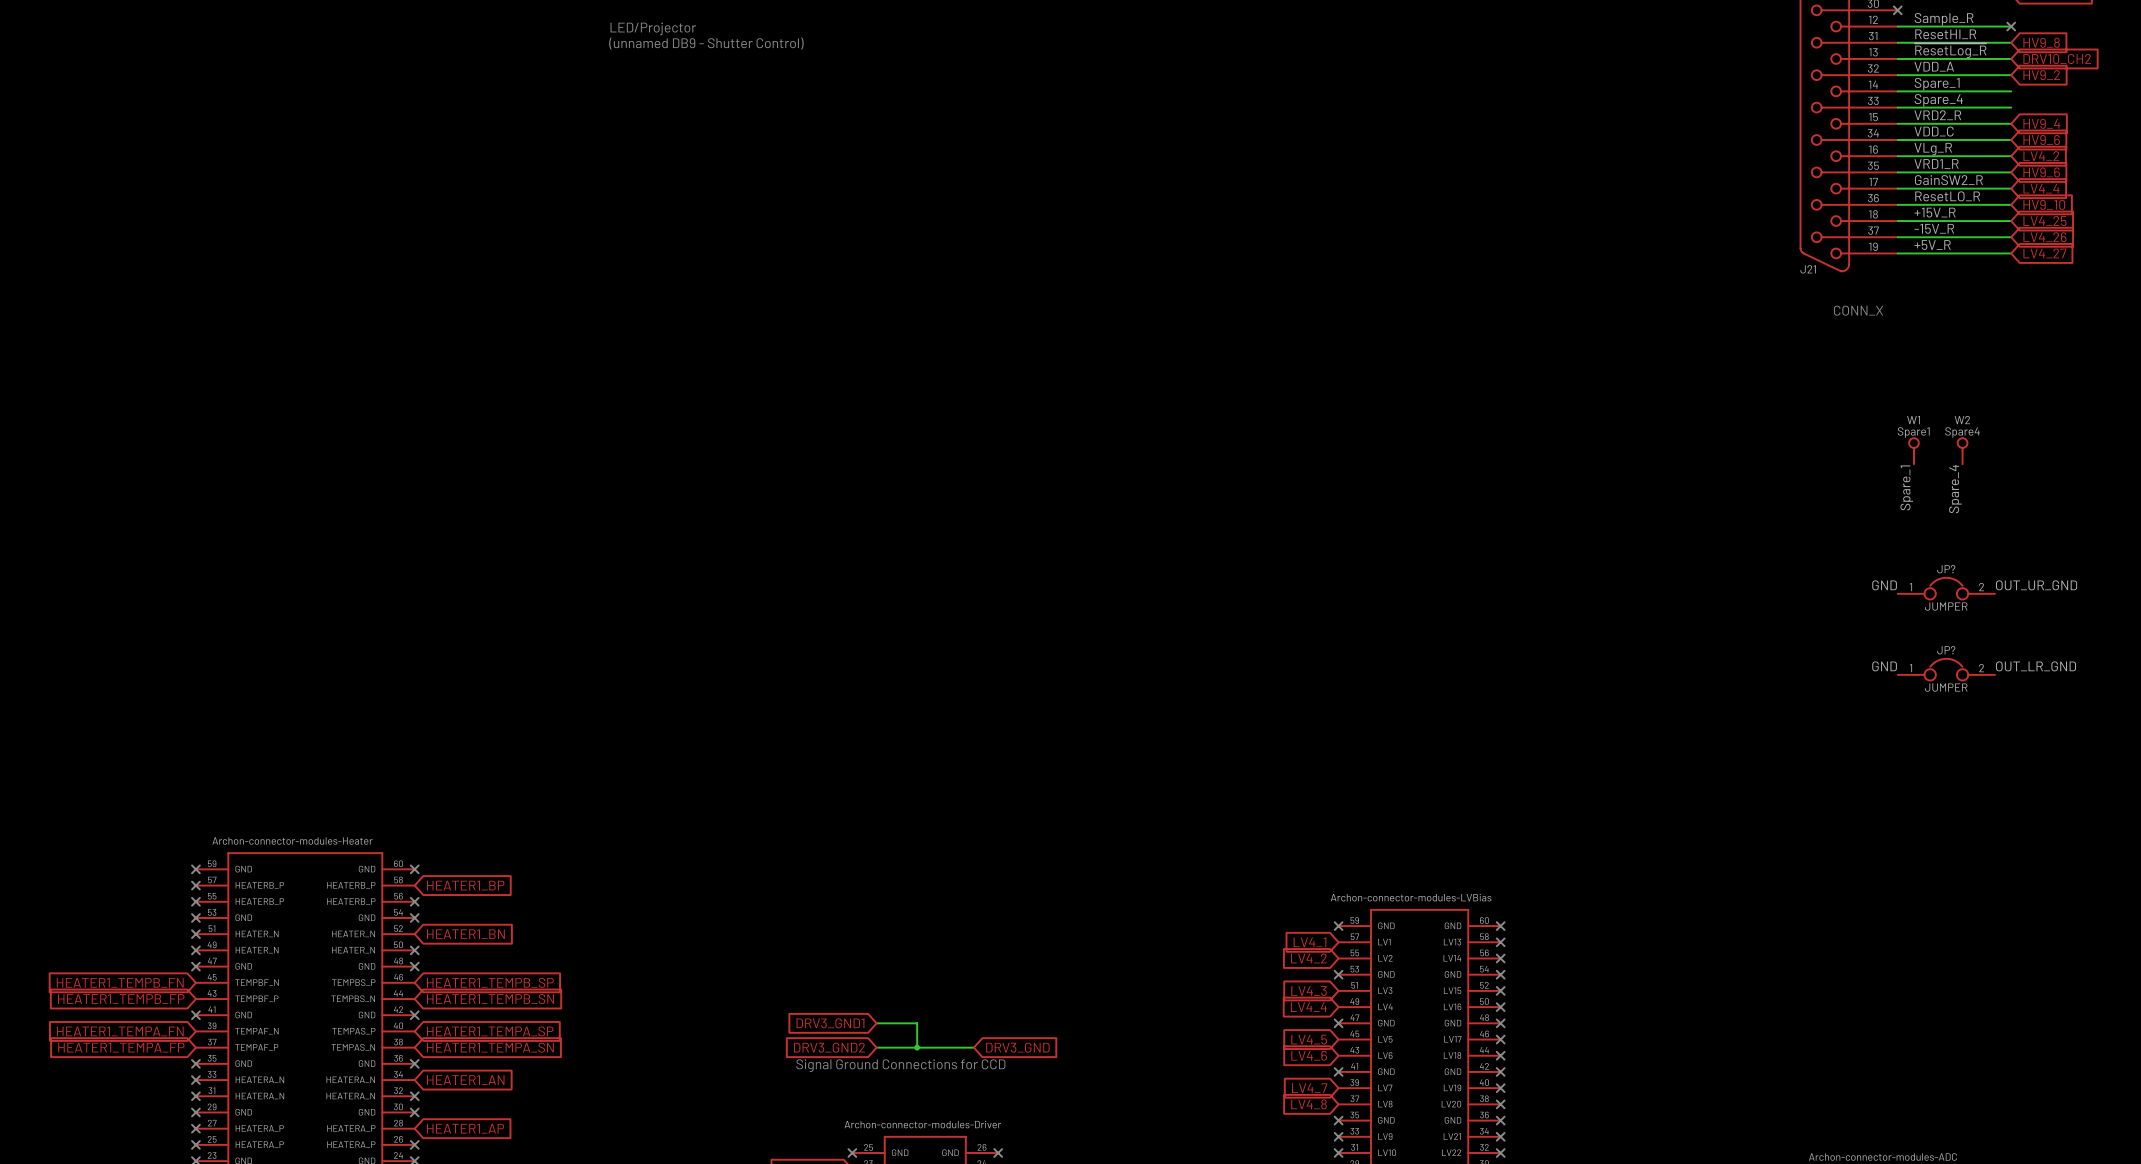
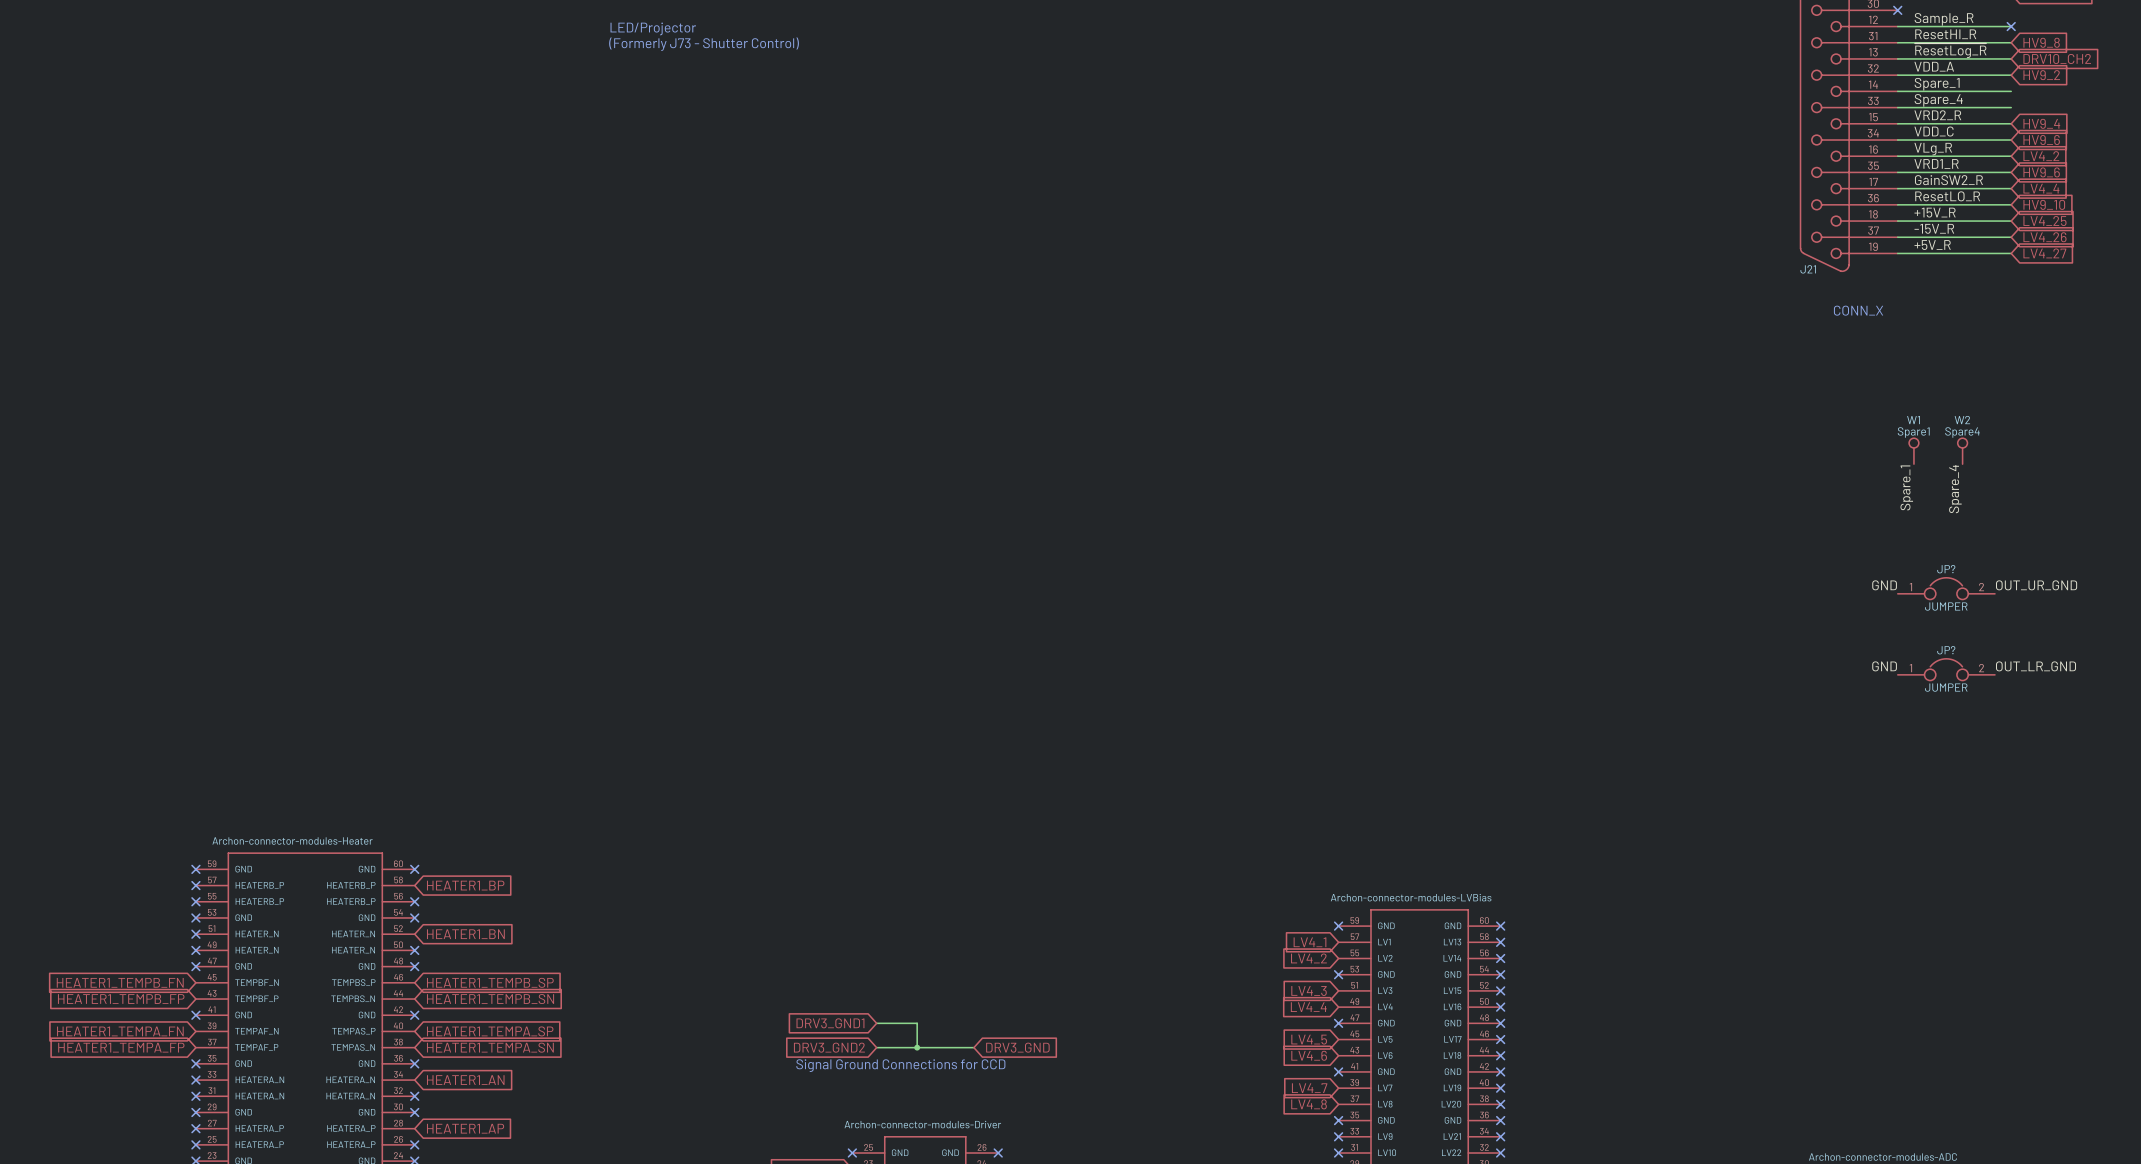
text: (unnamed DB9 - Shutter Control) (706, 43) -> (Formerly J73 - Shutter Control) (704, 44)

